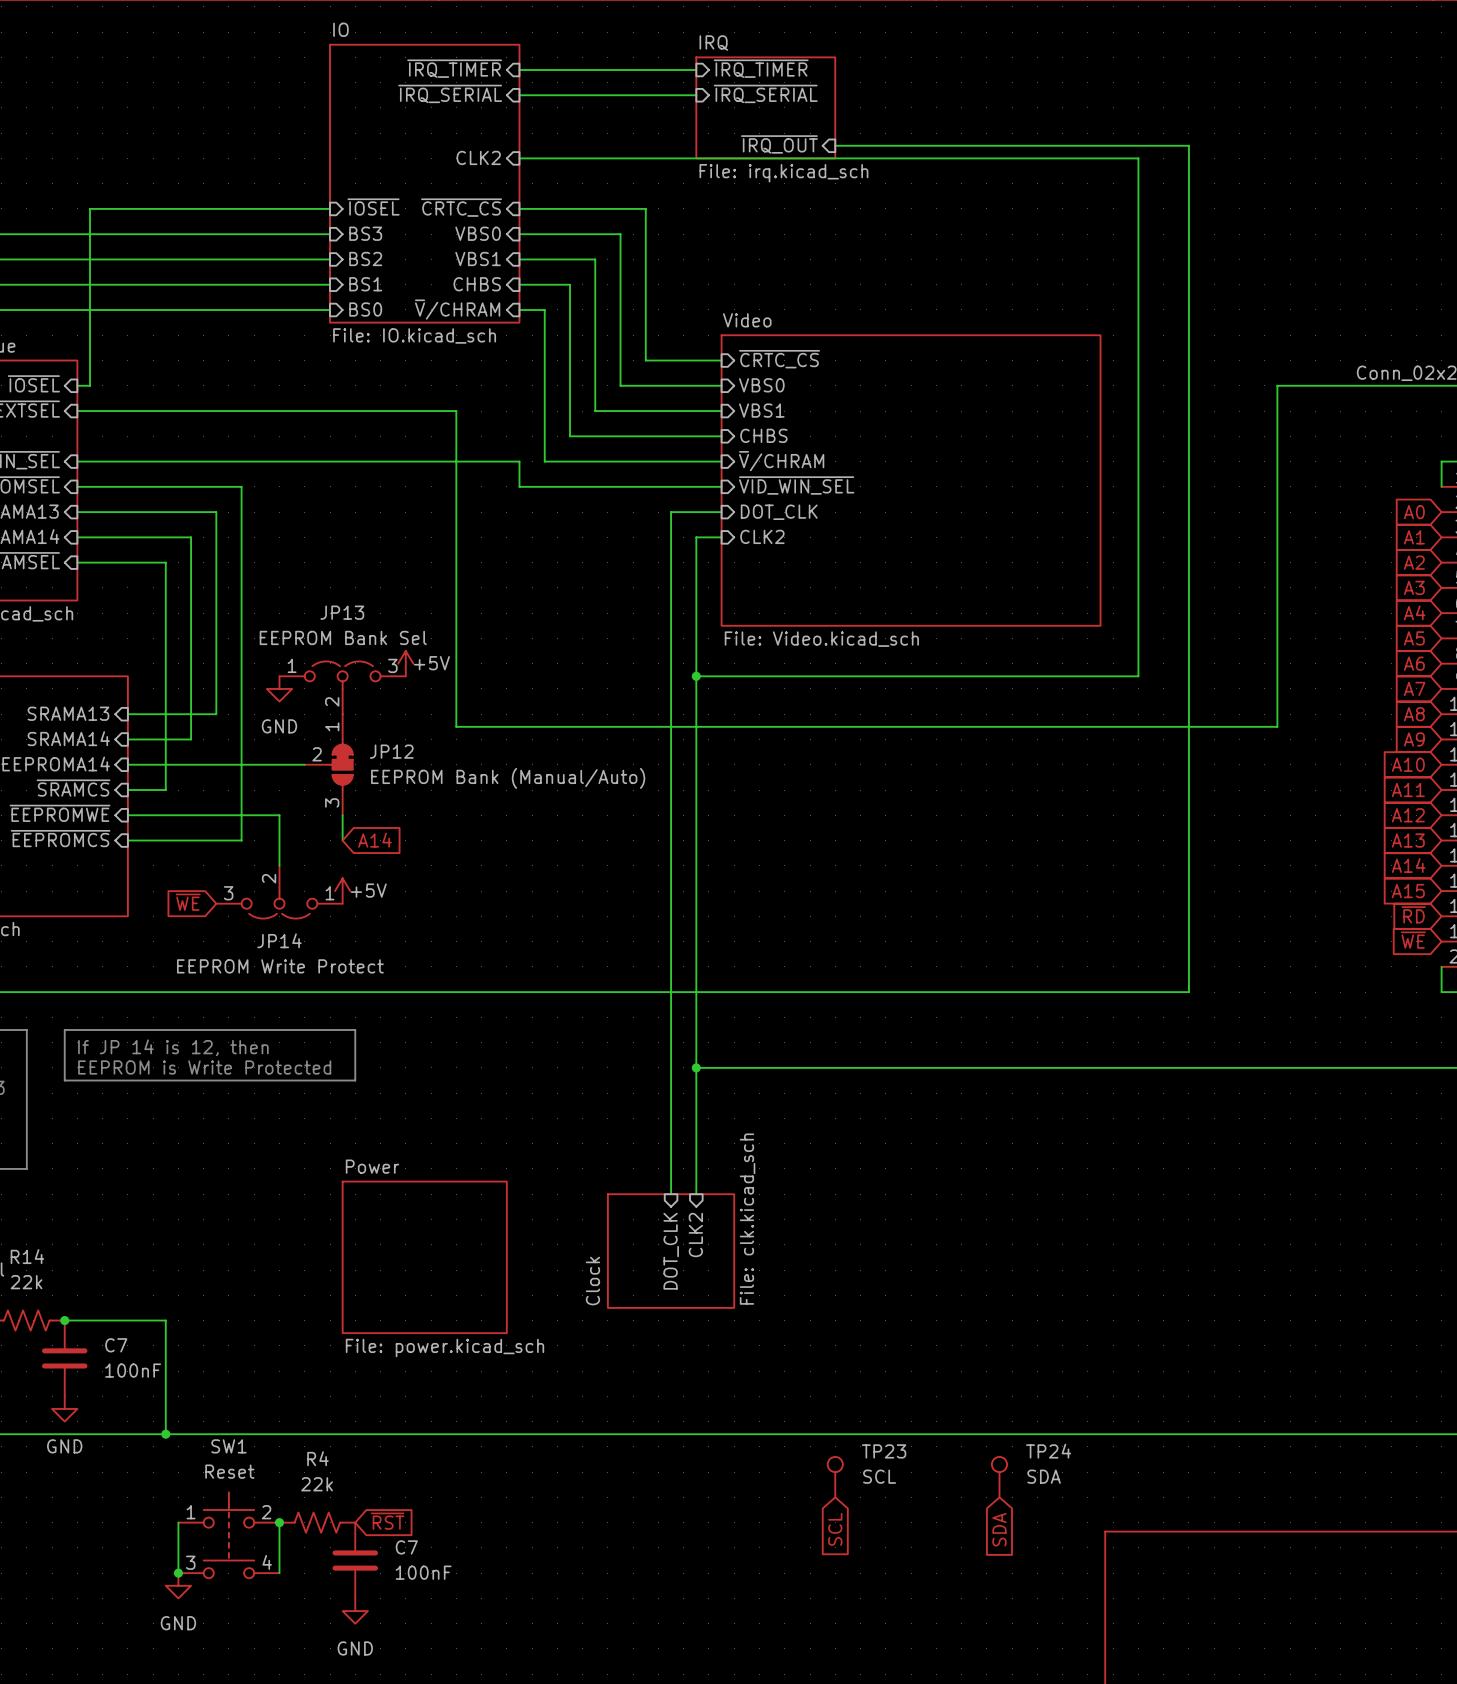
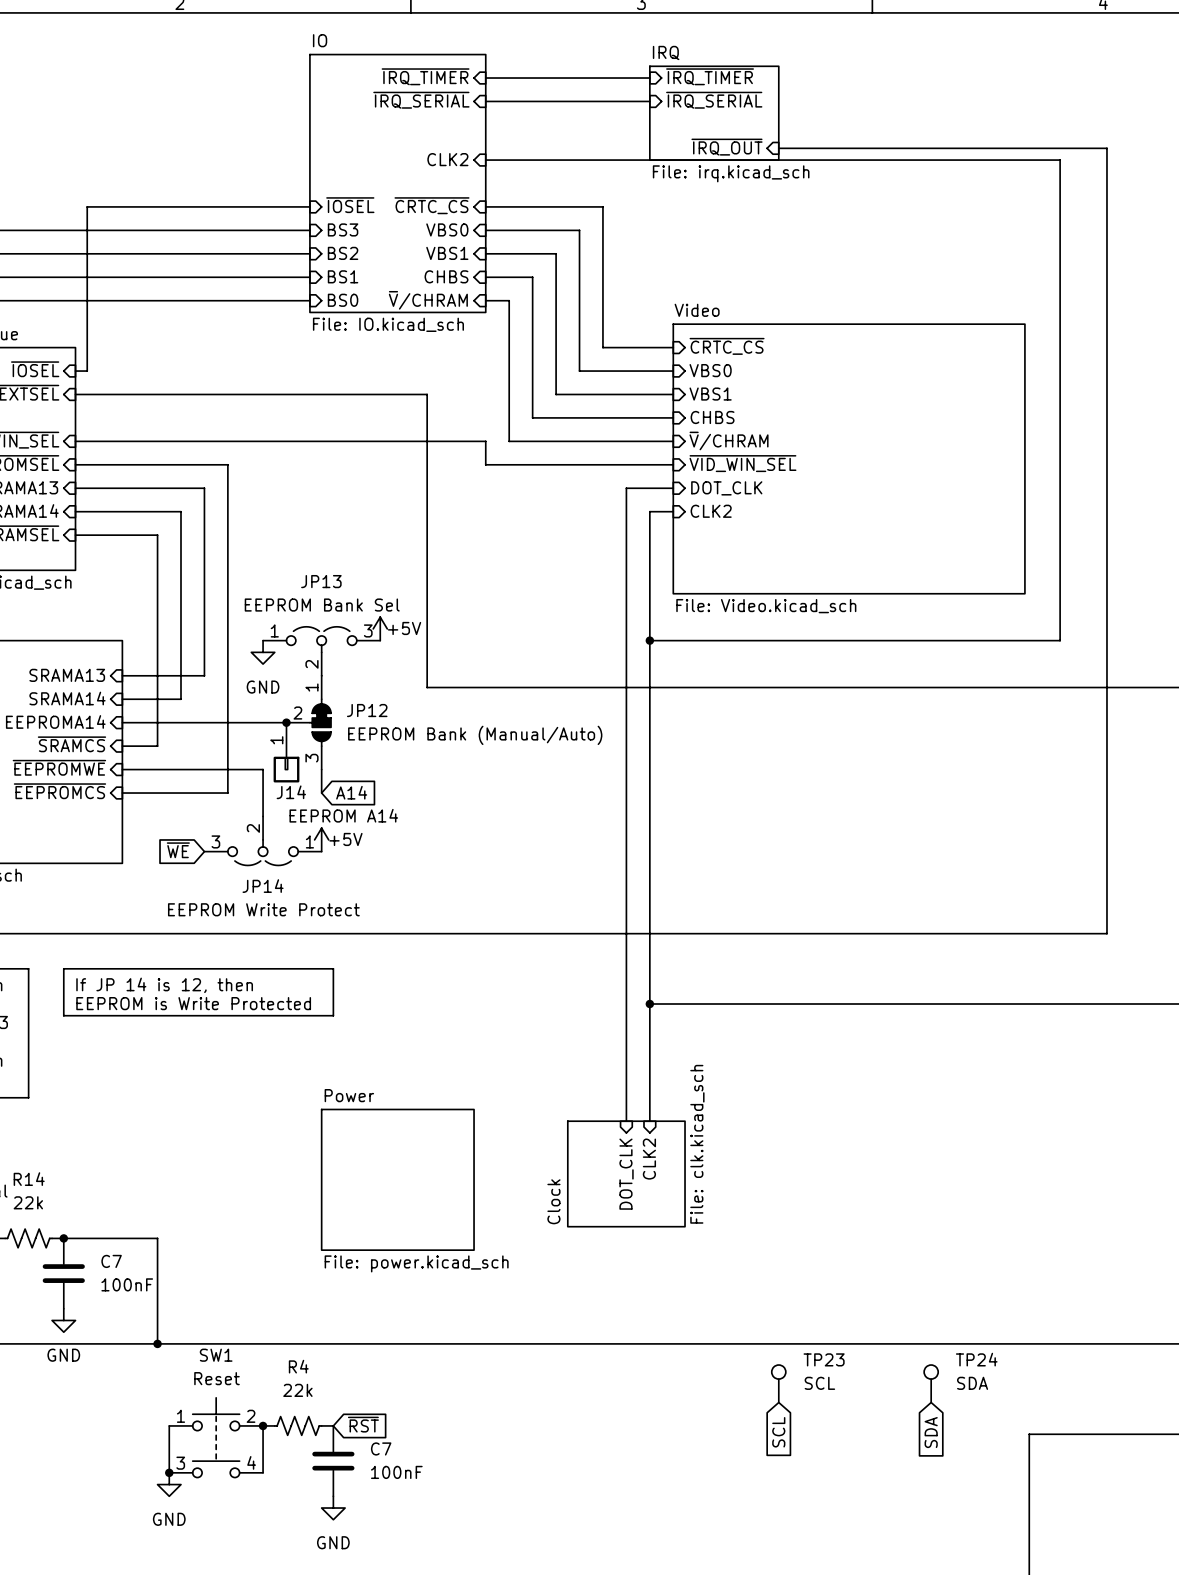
junction: none -> (286, 722)
J14: none -> EEPROM A14 (286, 752)

